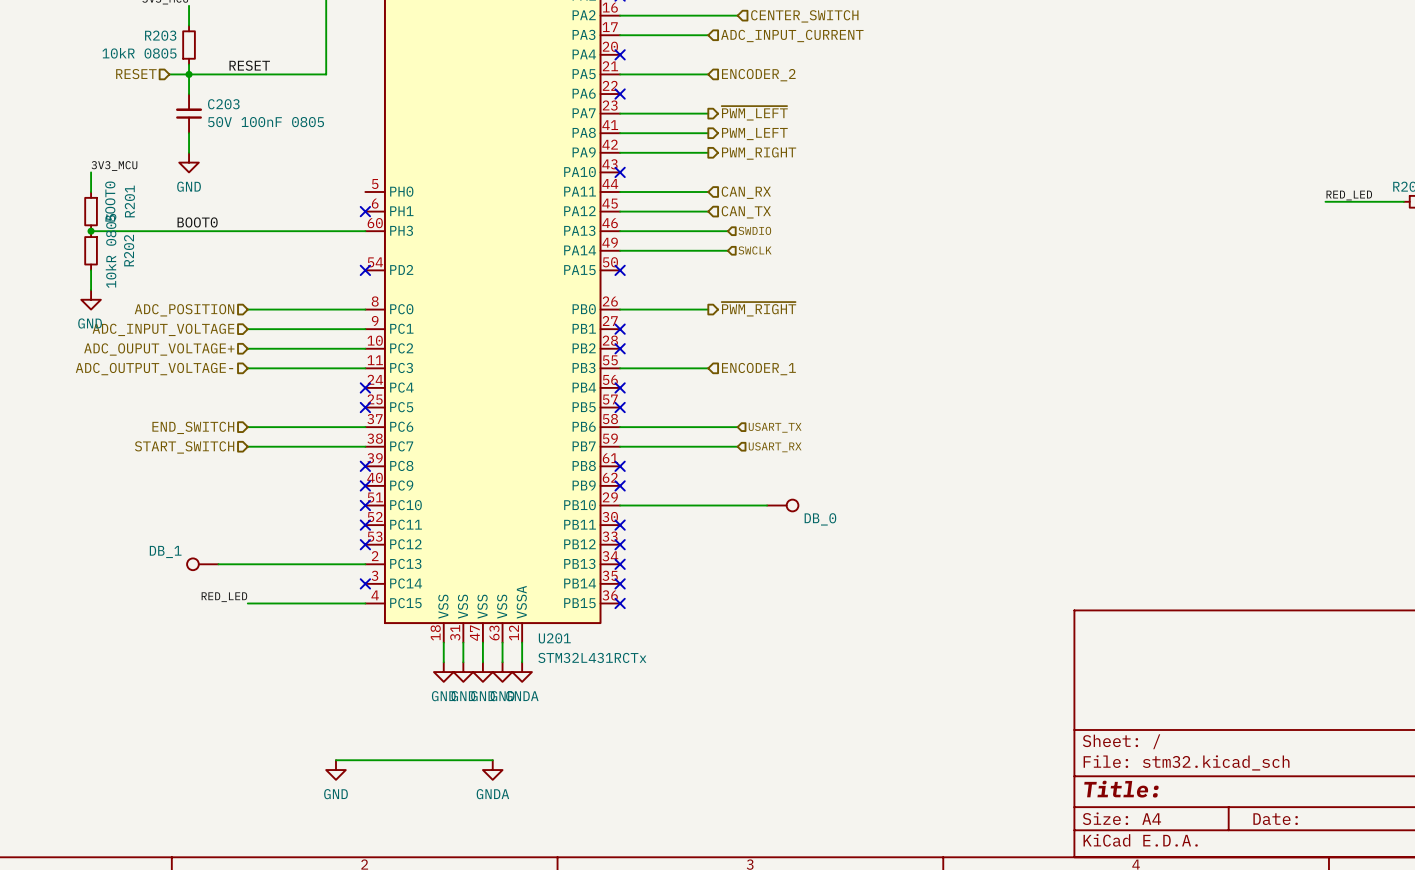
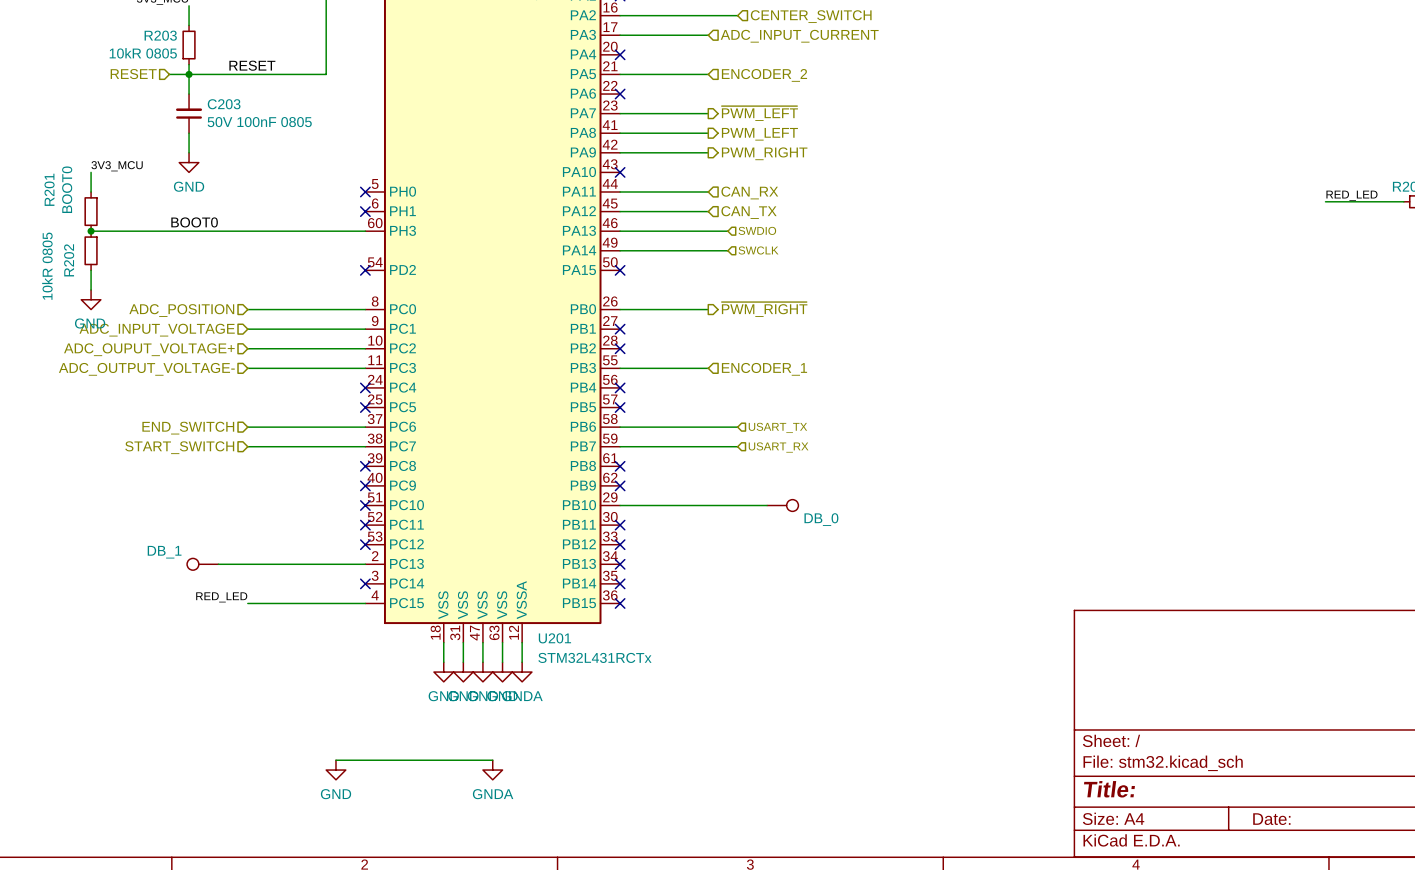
no-connect mark: none -> (365, 191)
R201 value position: BOOT0 (110, 201) -> BOOT0 (67, 189)
R201 name position: R201 (129, 201) -> R201 (49, 189)
R202 value position: 10kR 0805 (111, 250) -> 10kR 0805 (47, 266)
R202 name position: R202 (129, 250) -> R202 (69, 260)

